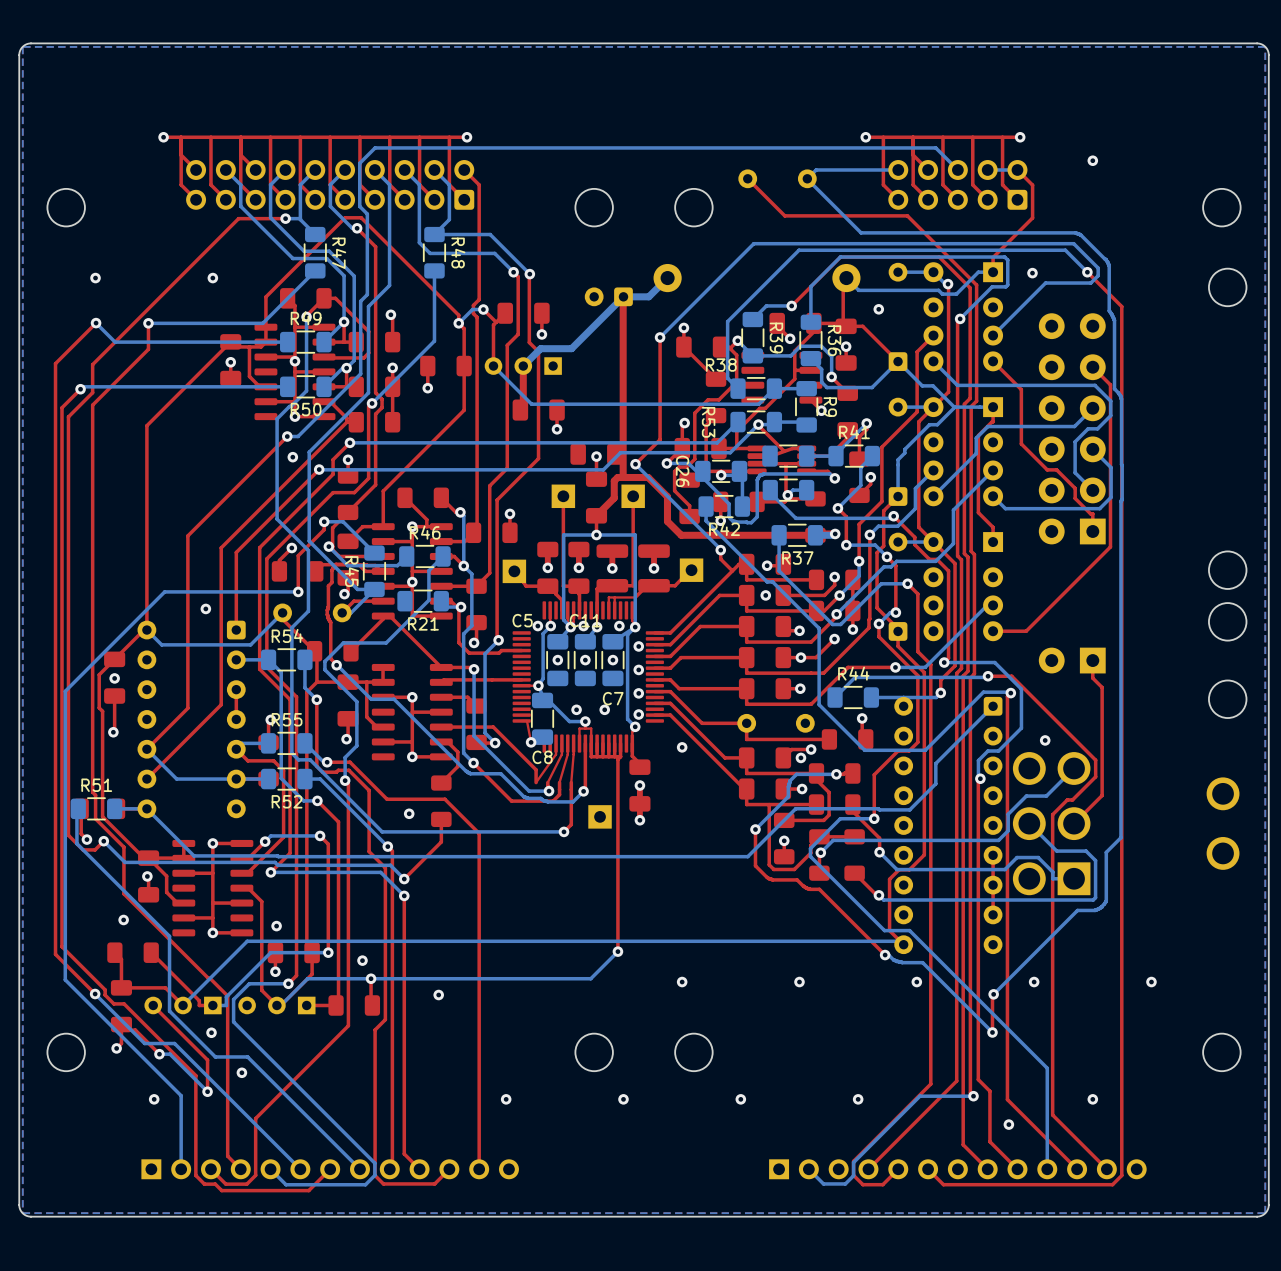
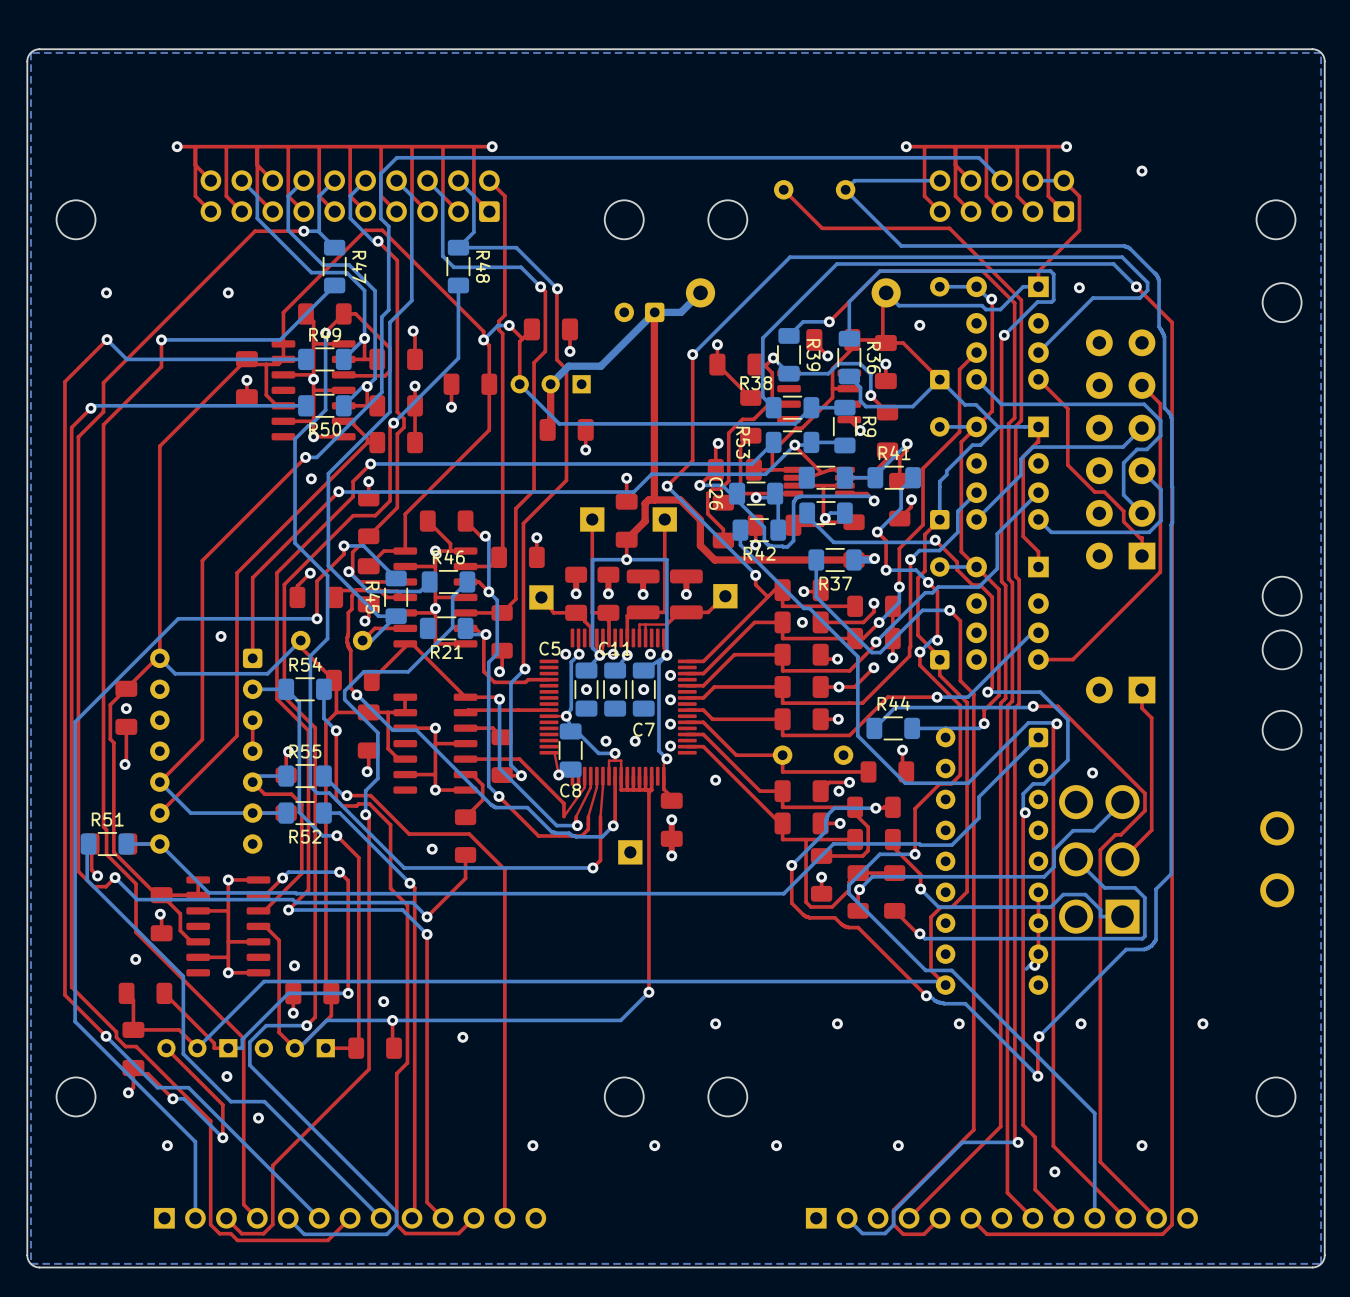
part: (596, 454) -> none
bottom track: none -> (1034, 965) (1029, 965) (1026, 969)
via: none -> (1034, 965)

